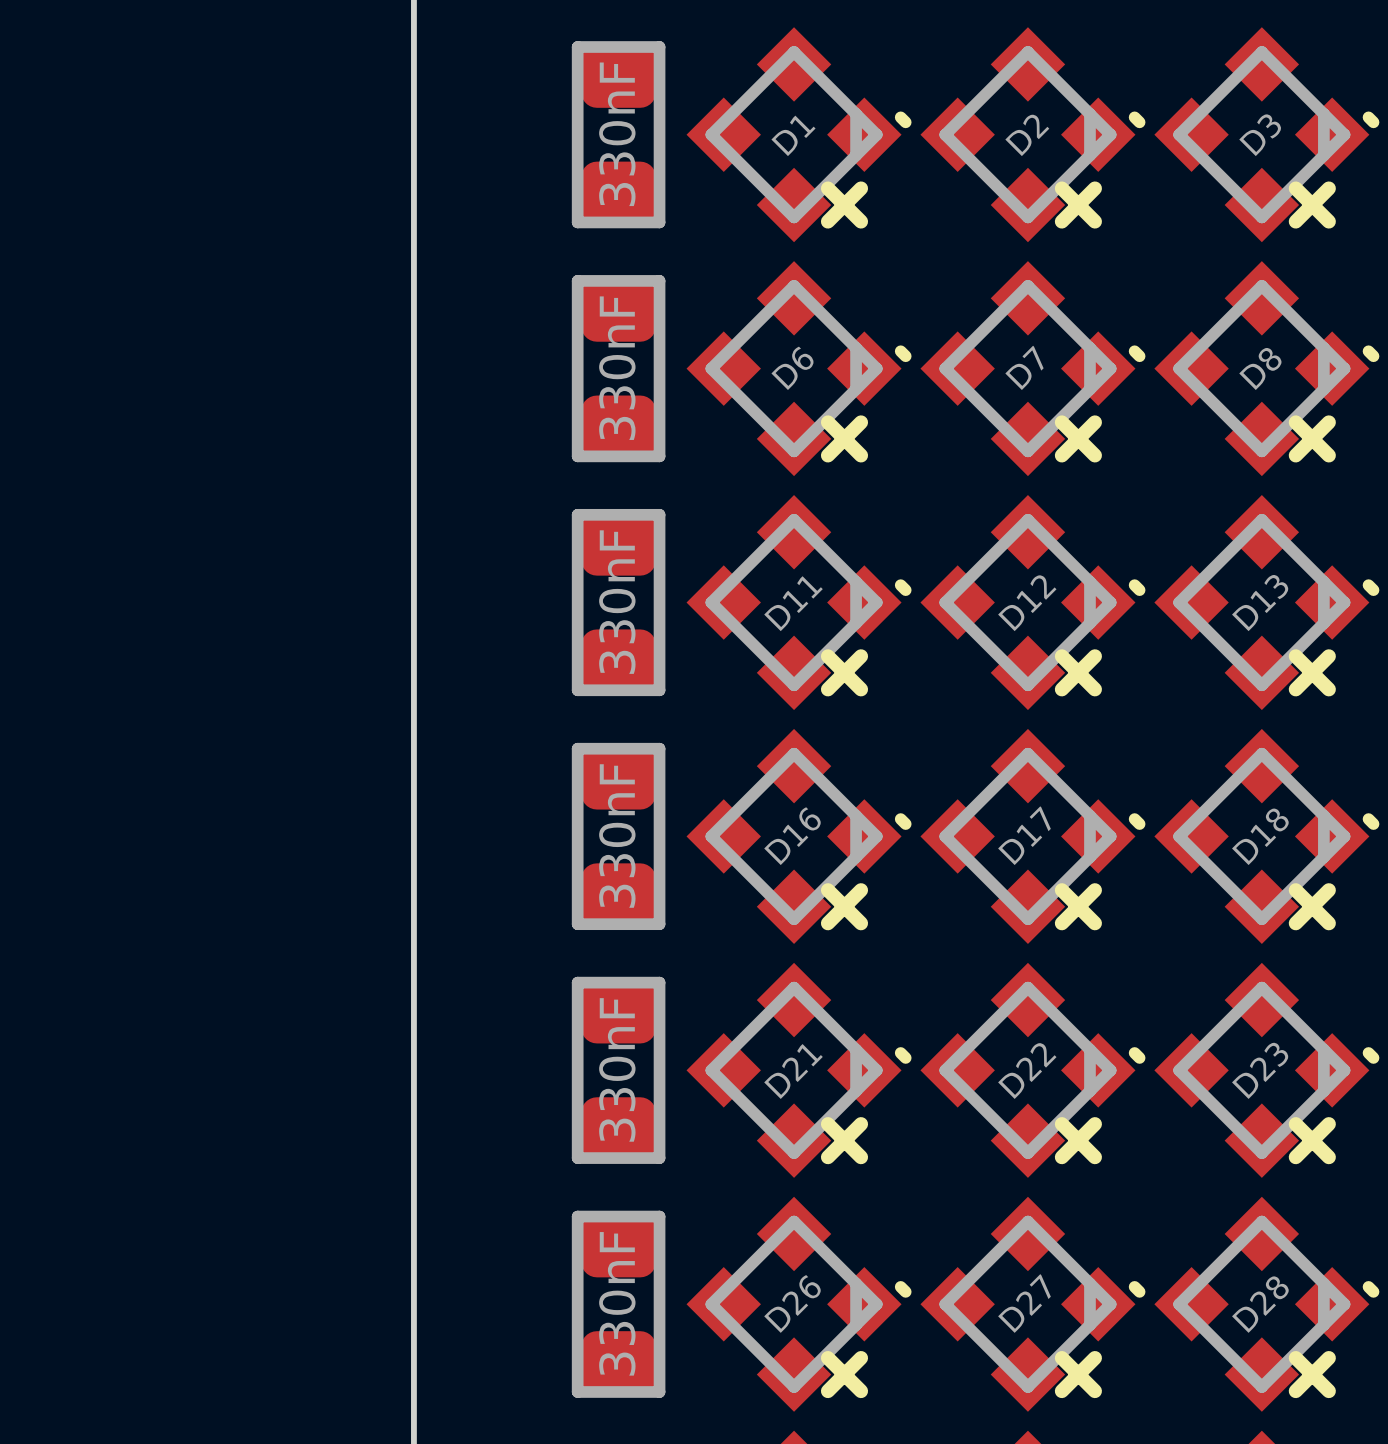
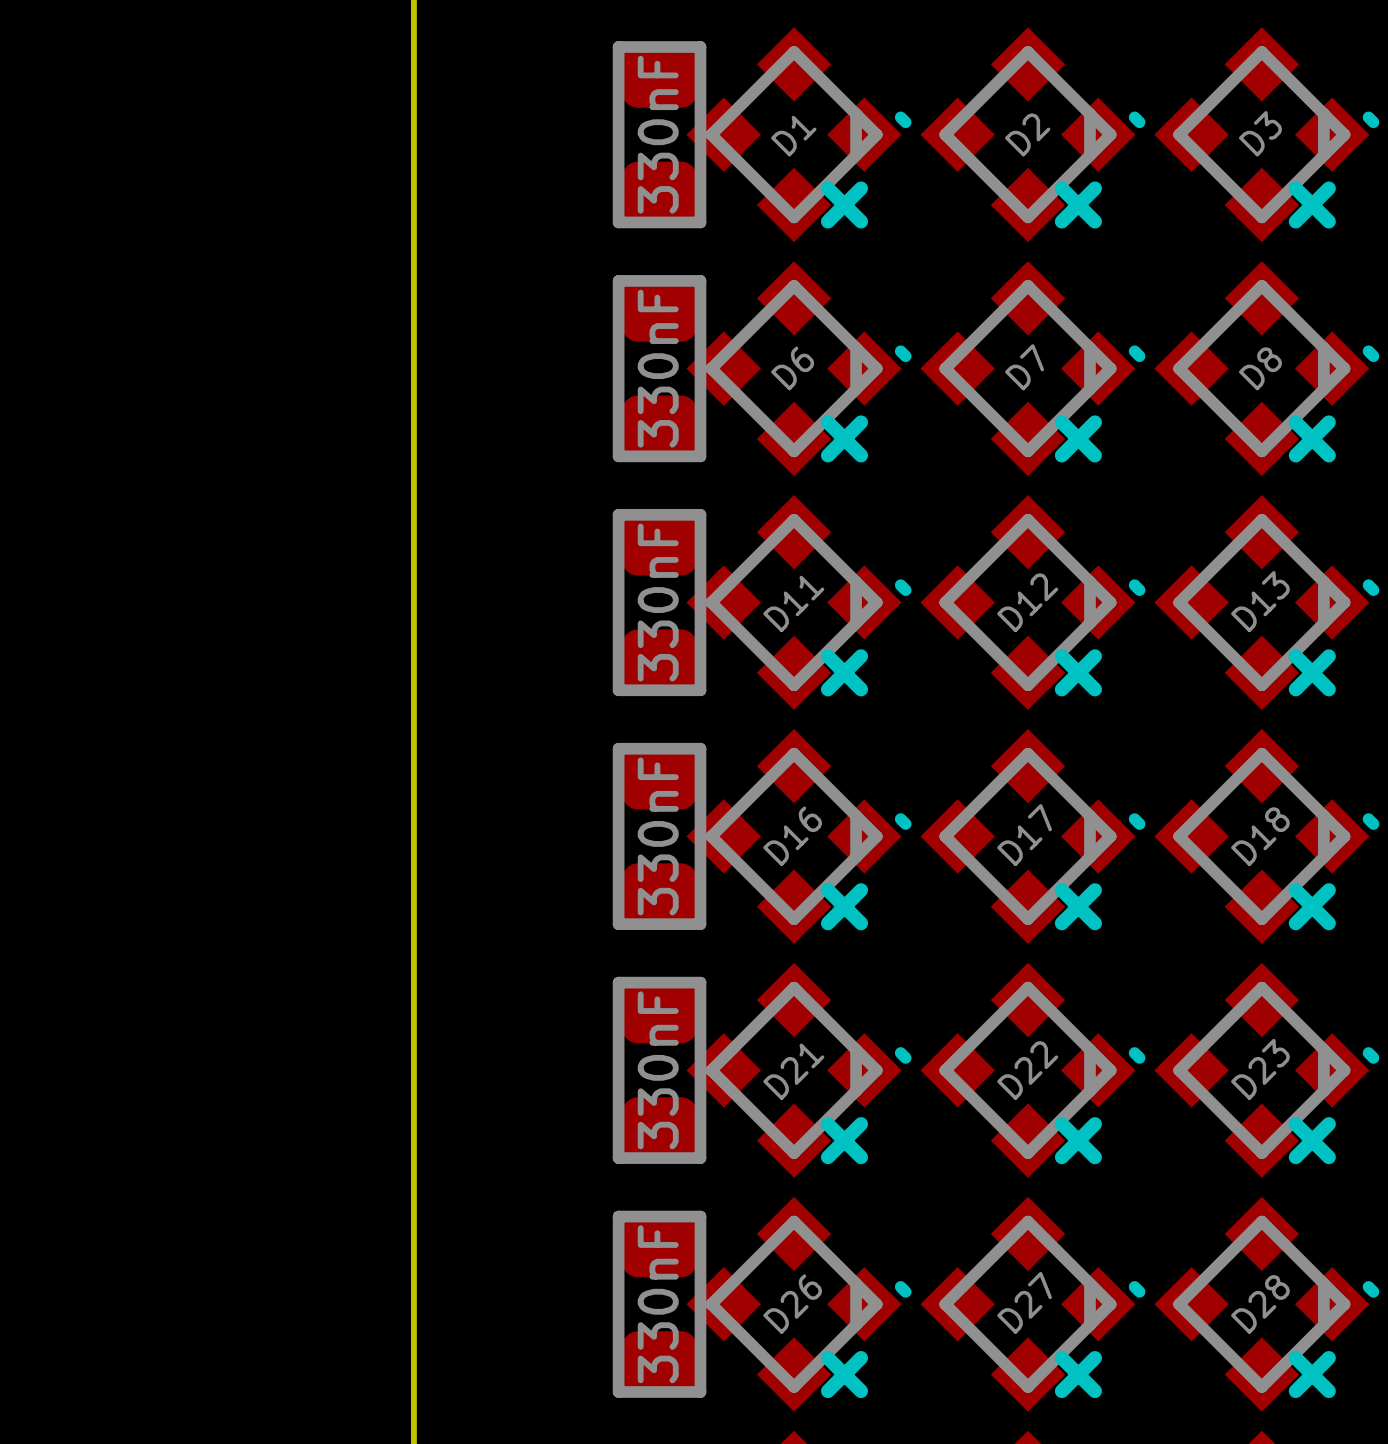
part position: (618, 134) -> (659, 134)
part position: (618, 368) -> (659, 368)
part position: (618, 602) -> (659, 602)
part position: (618, 836) -> (659, 836)
part position: (618, 1070) -> (659, 1070)
part position: (618, 1304) -> (659, 1304)

